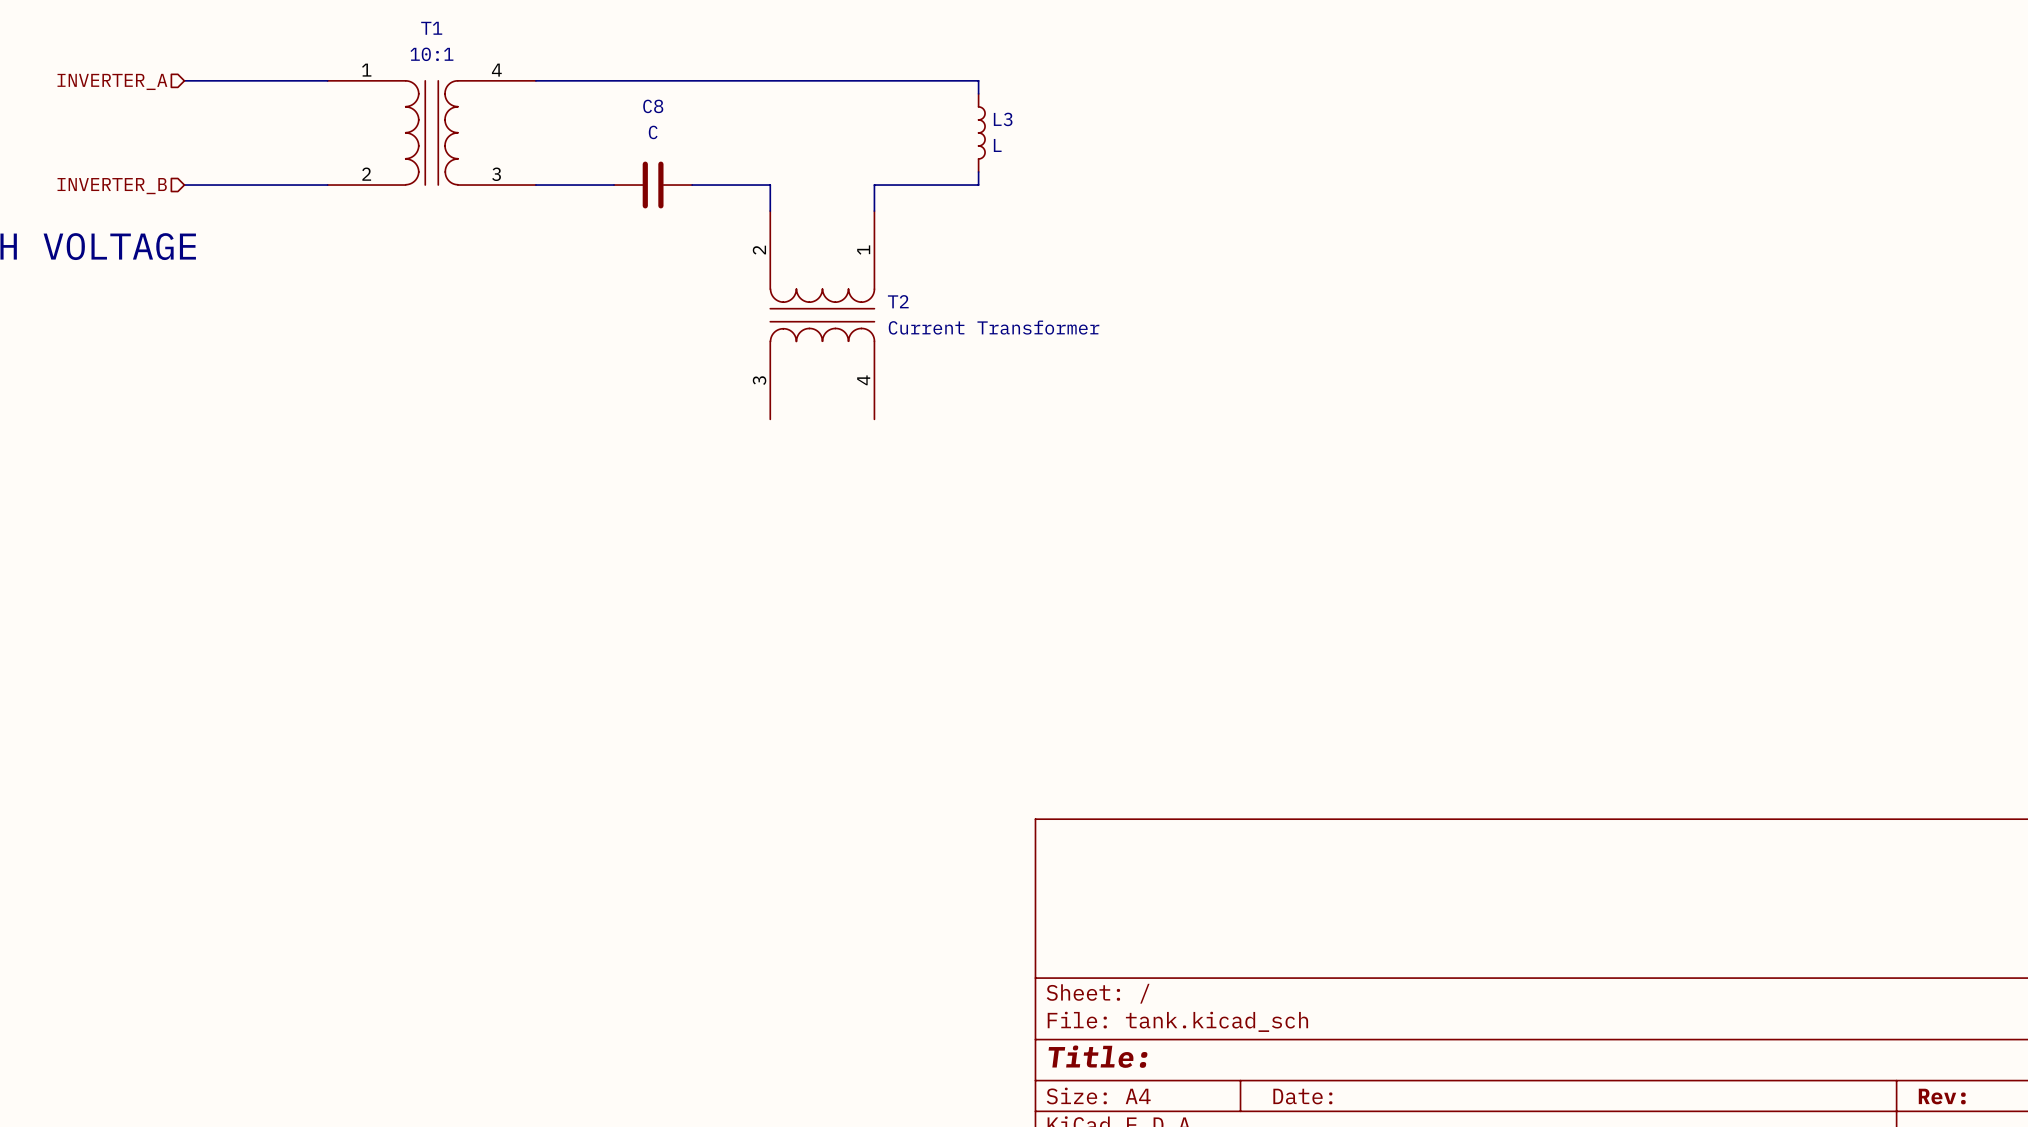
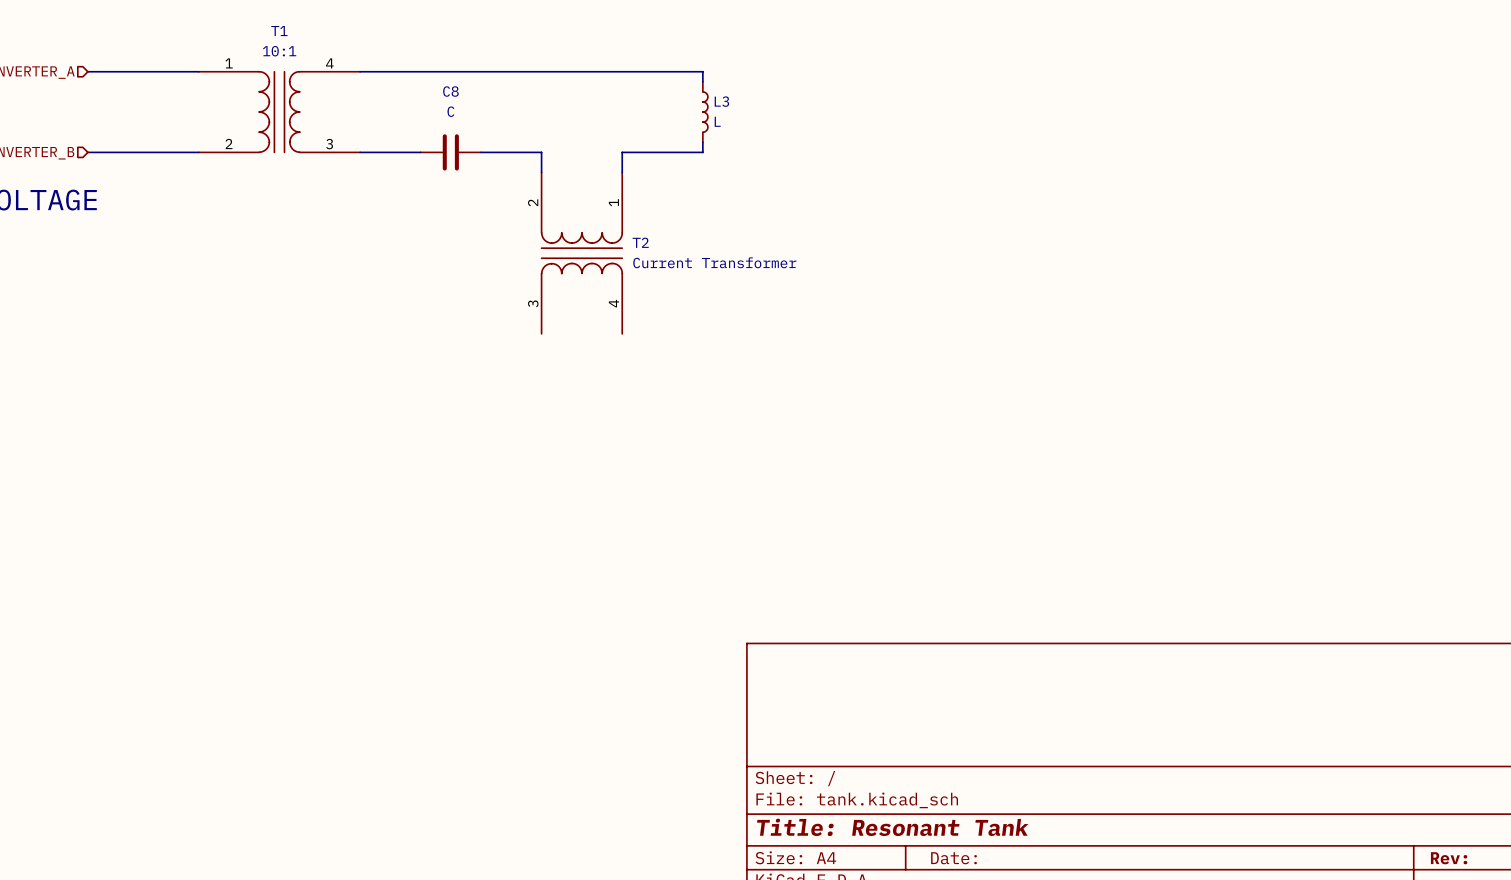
title block: Title: (1098, 1056) -> Title: Resonant Tank (892, 827)

